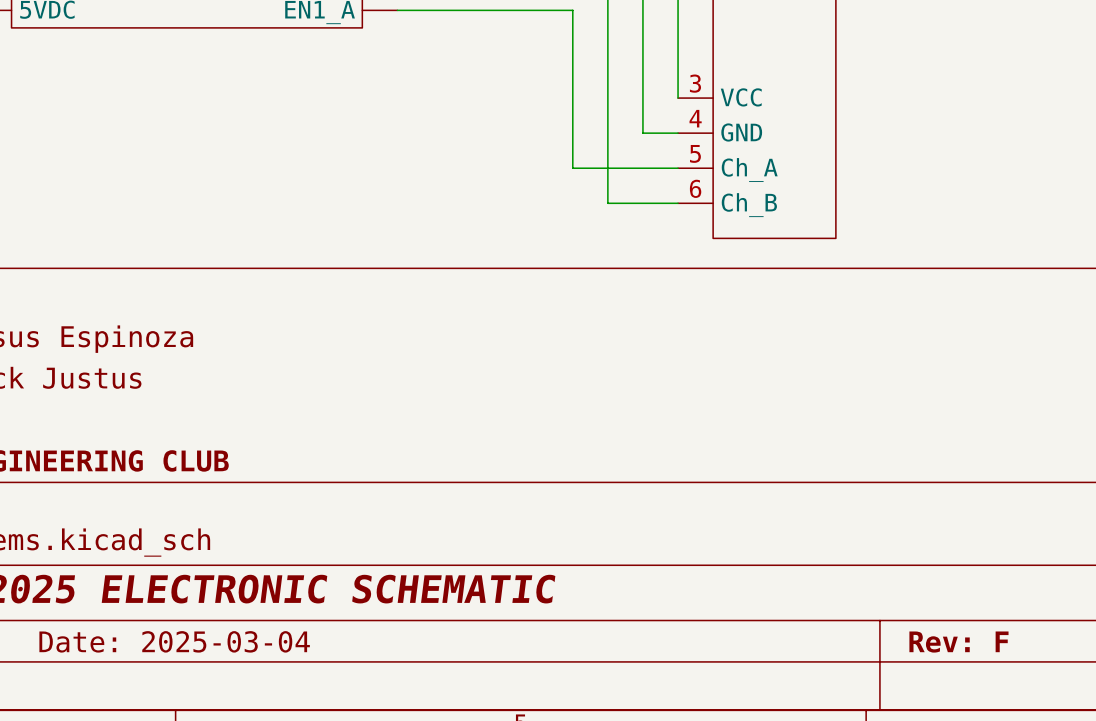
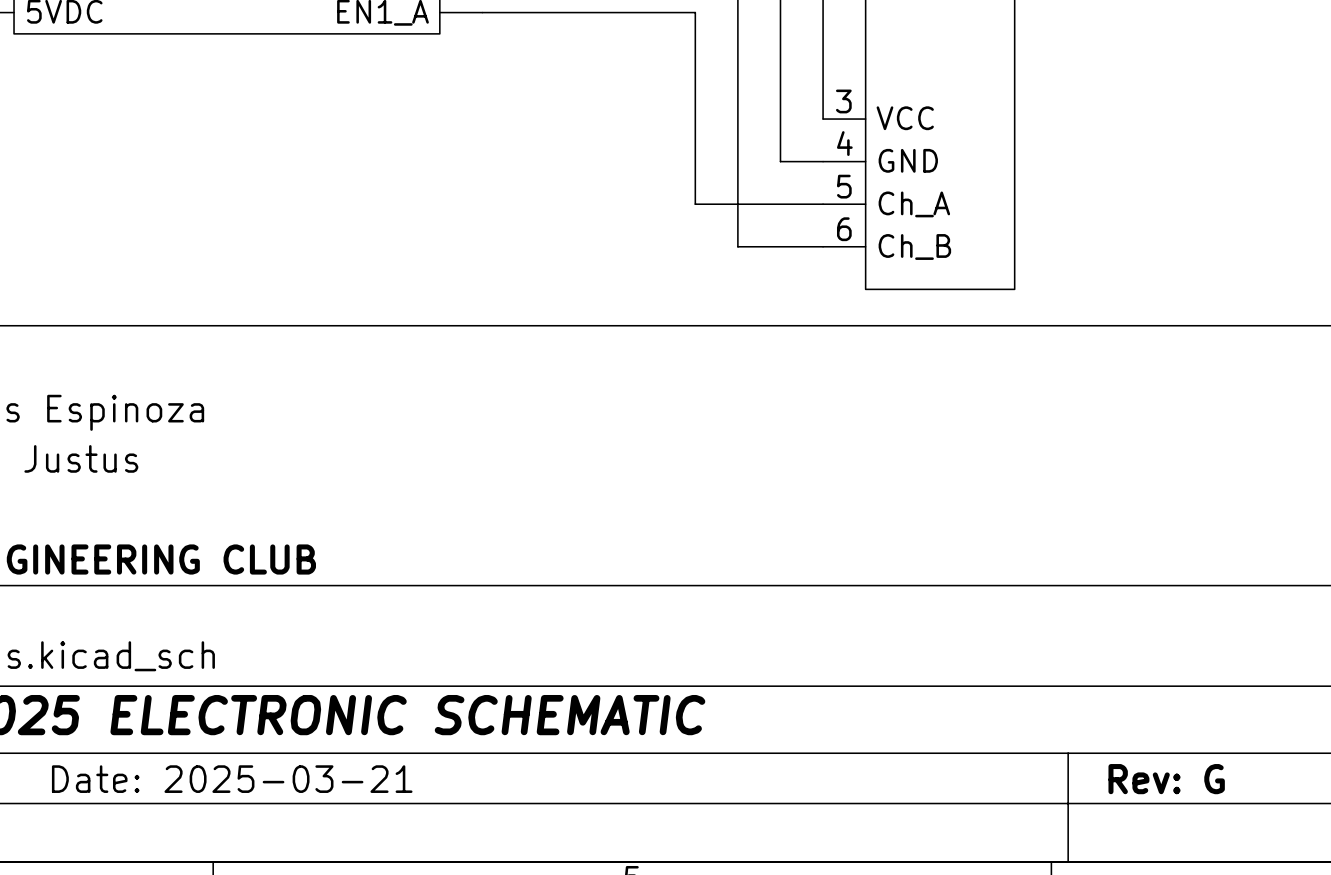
title block: Date: 2025-03-04 (174, 641) -> Date: 2025-03-21 (232, 779)
title block: Rev: F (958, 642) -> Rev: G (1166, 779)

